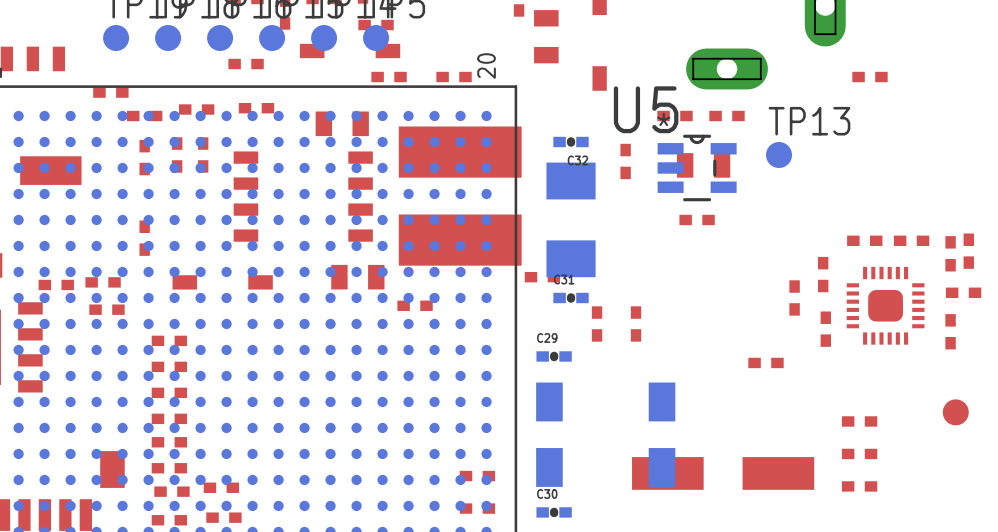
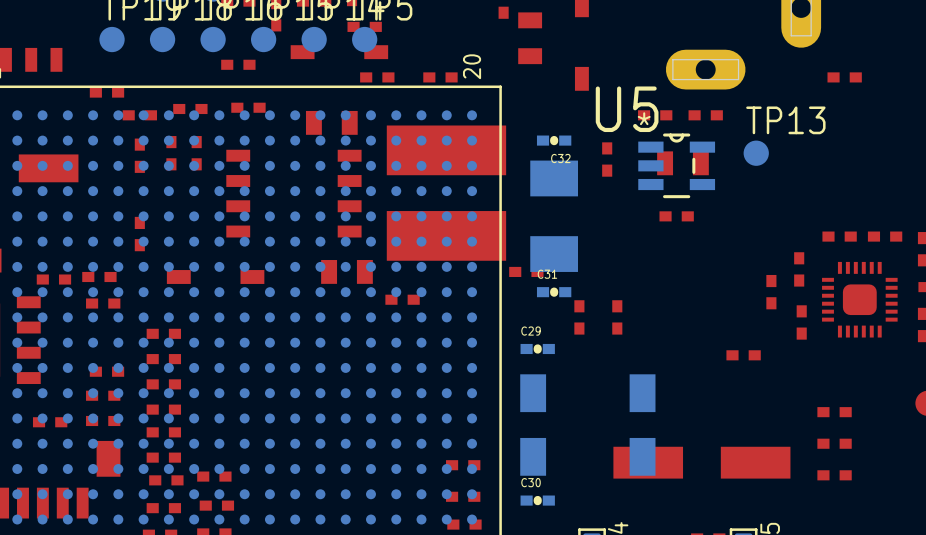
part: none -> (106, 371)
part: none -> (103, 395)
part: none -> (103, 420)
part: none -> (50, 422)

